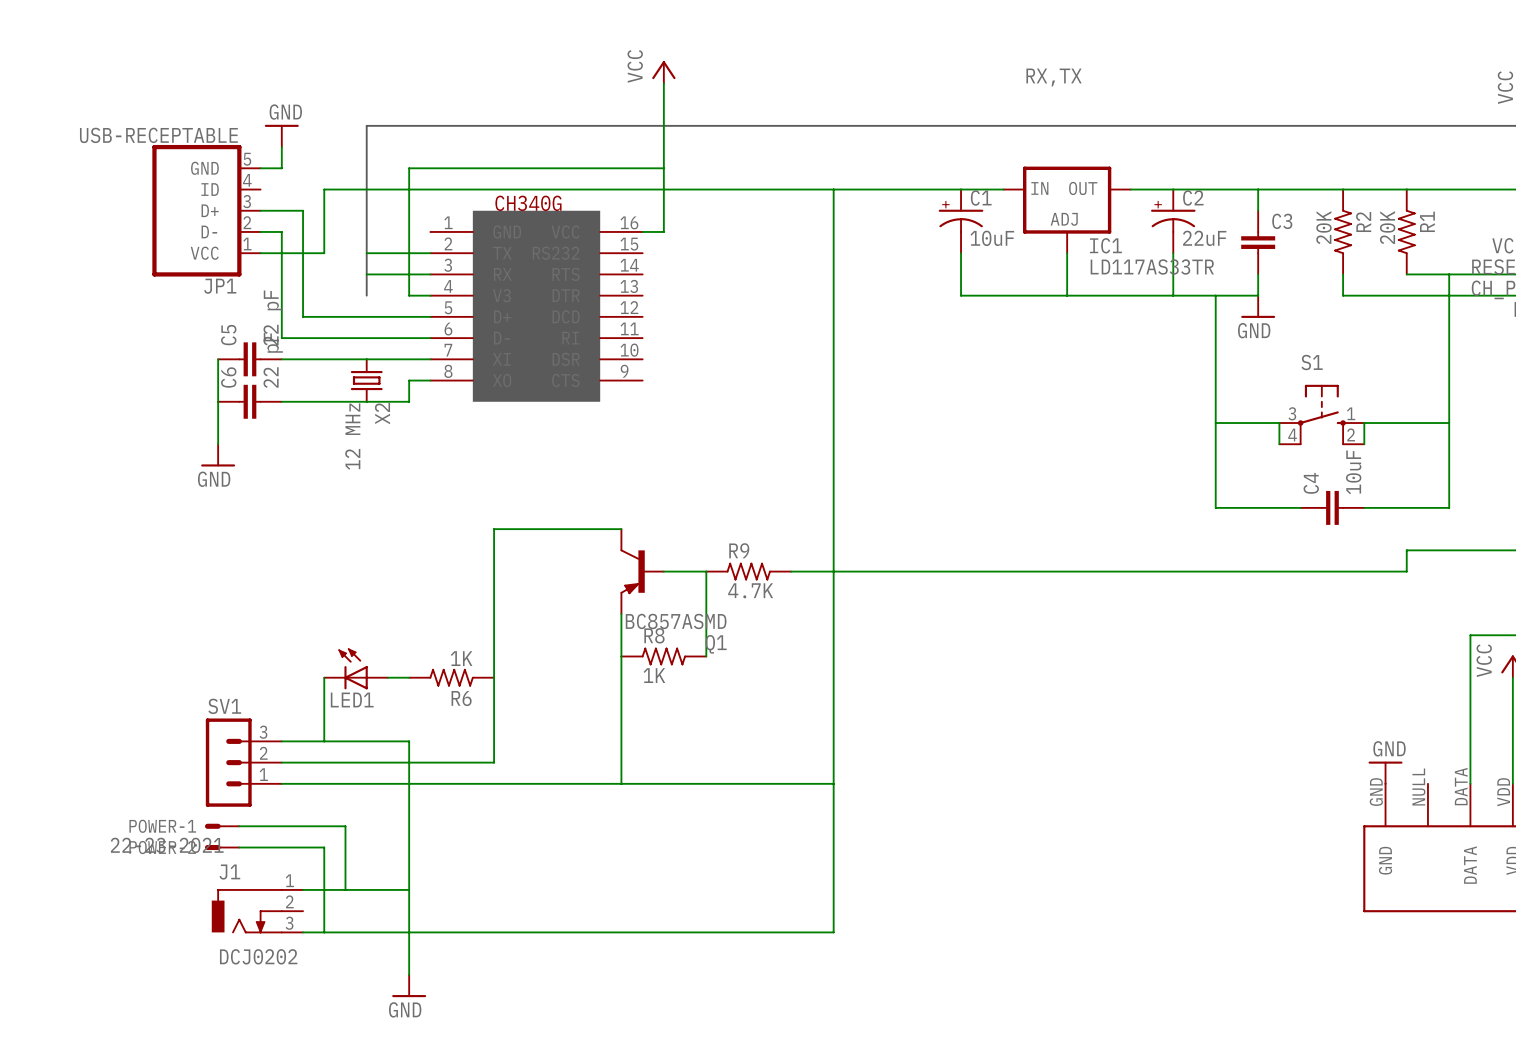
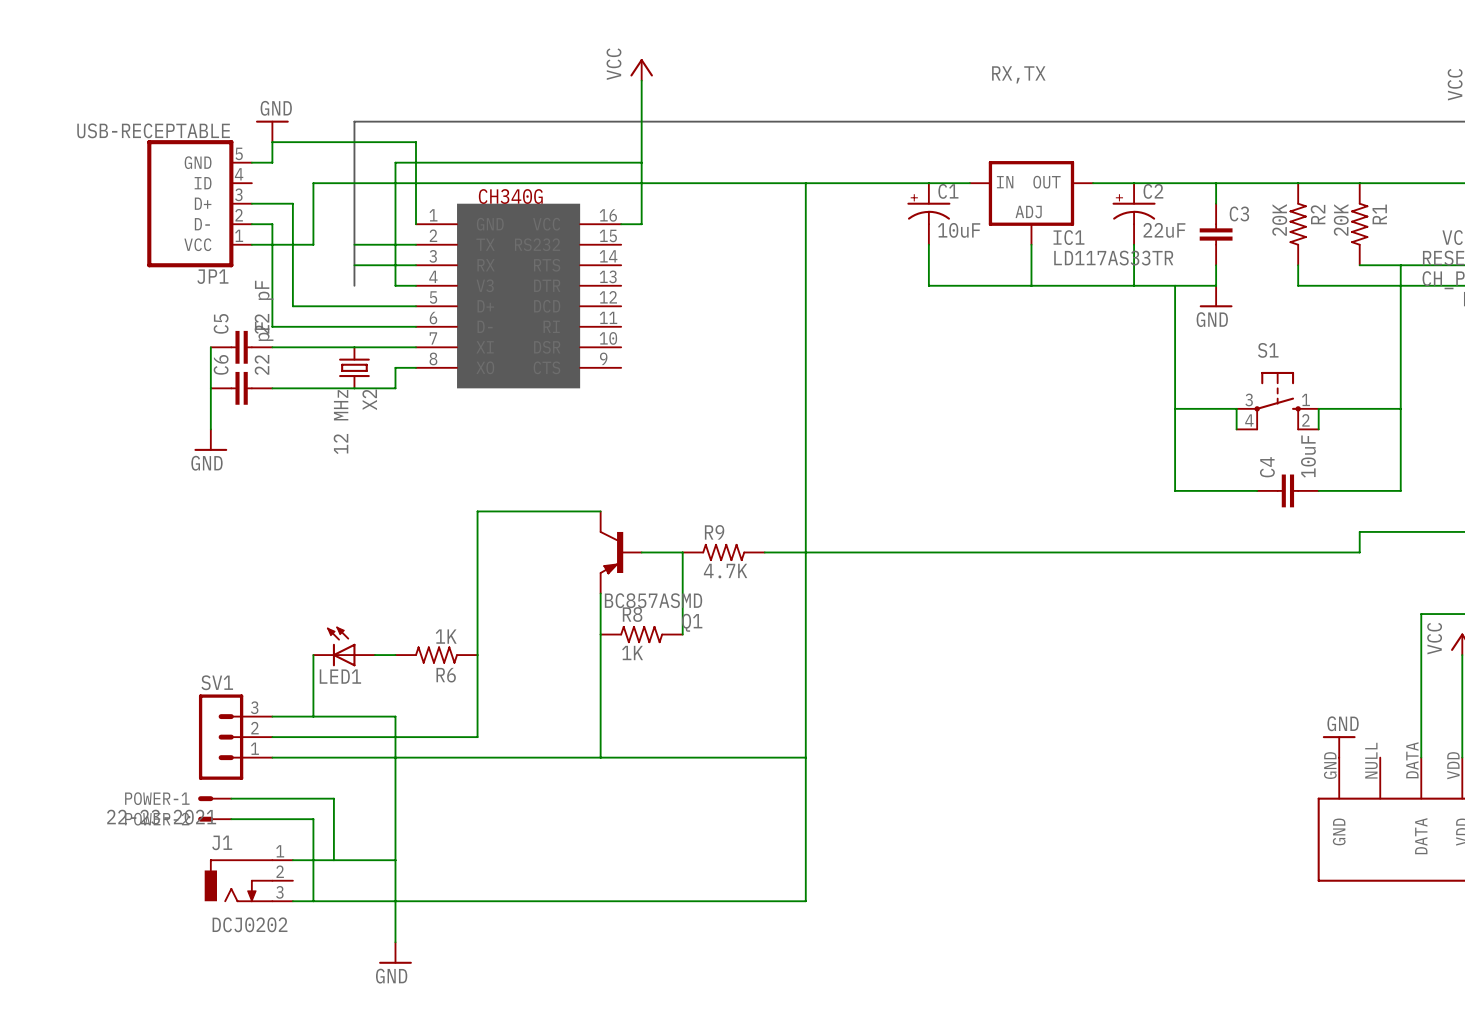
wire: none -> (272, 142) (416, 142) (416, 224)

